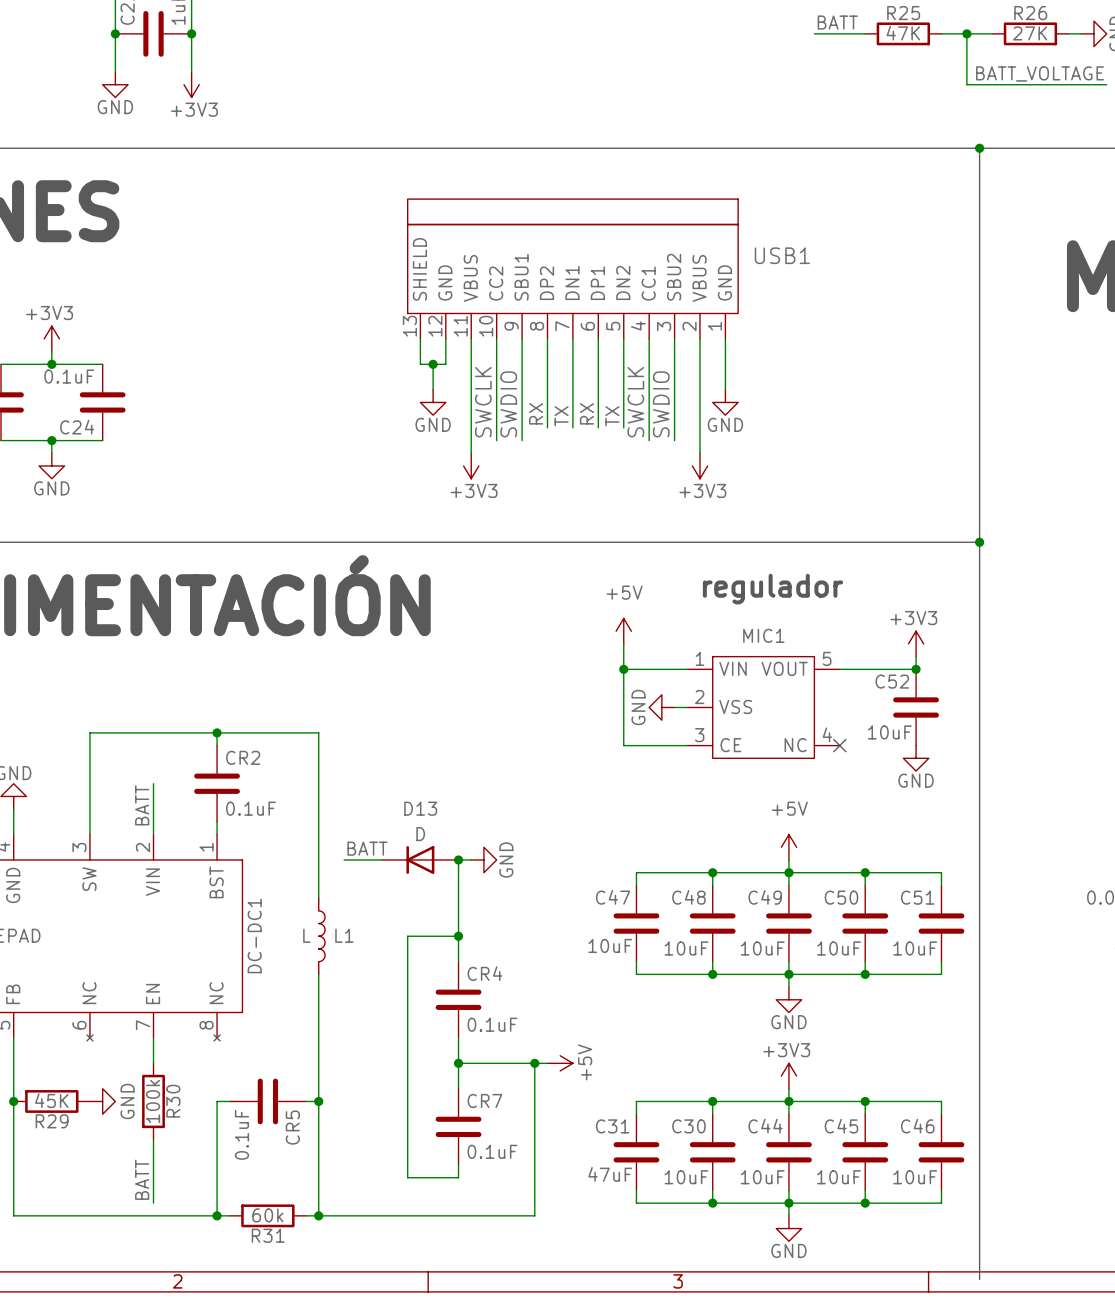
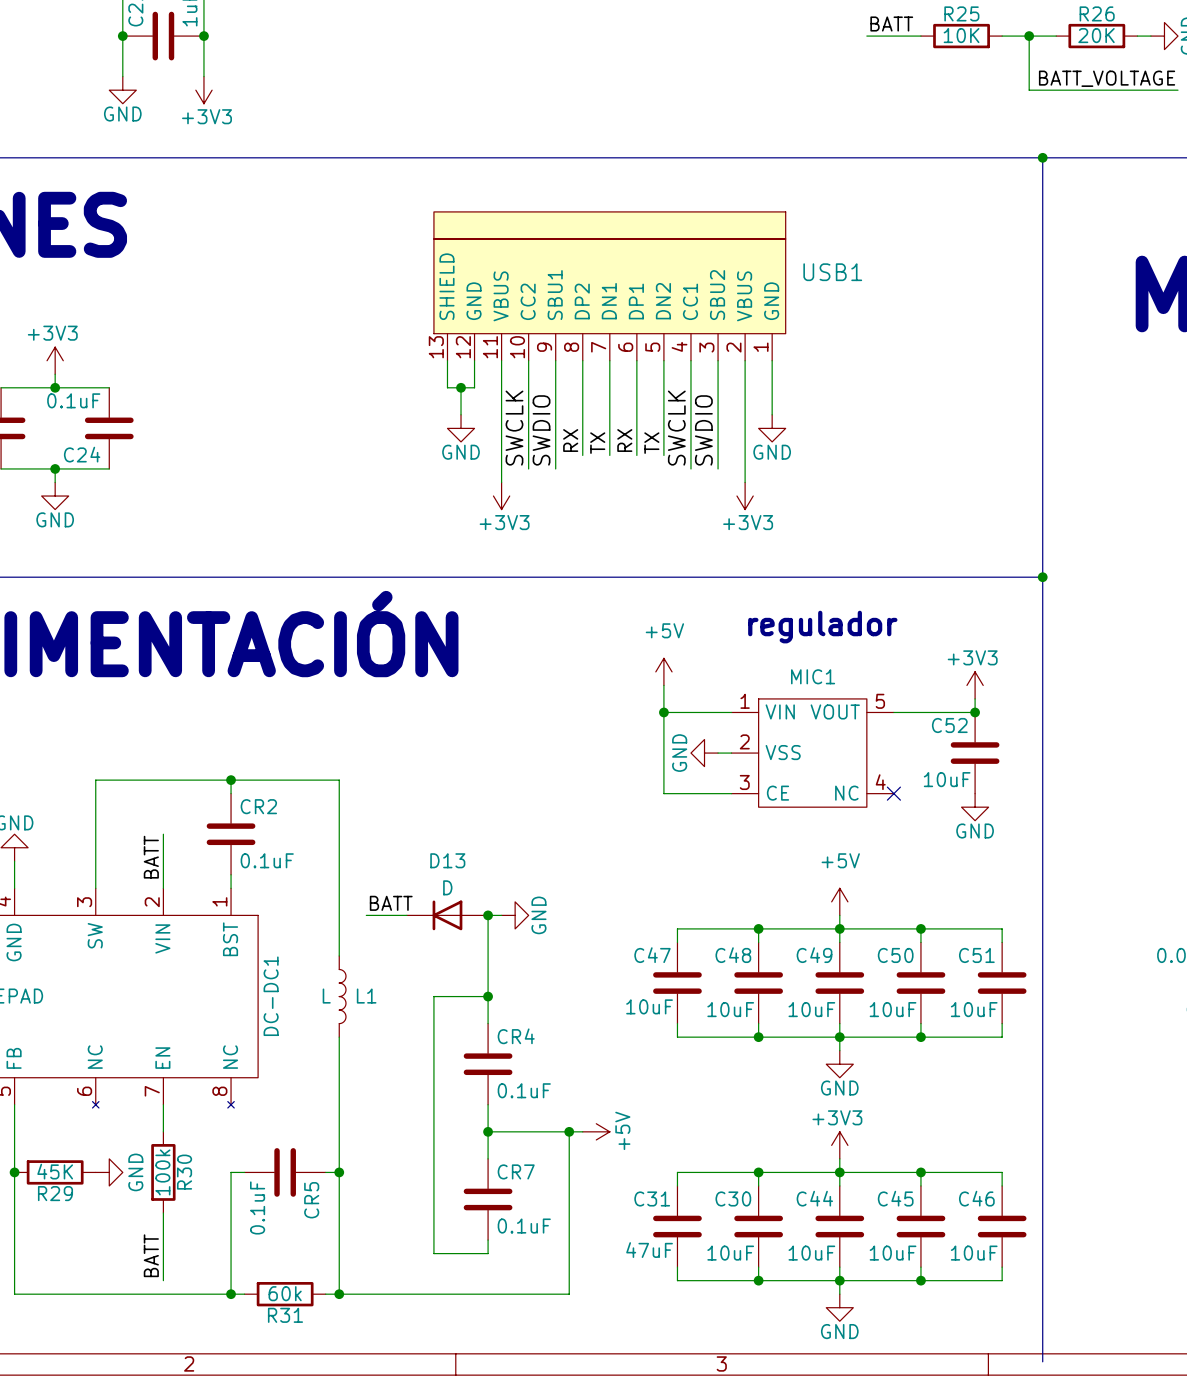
R25 value: 47K (903, 33) -> 10K (961, 35)
R26 value: 27K (1030, 33) -> 20K (1096, 35)

